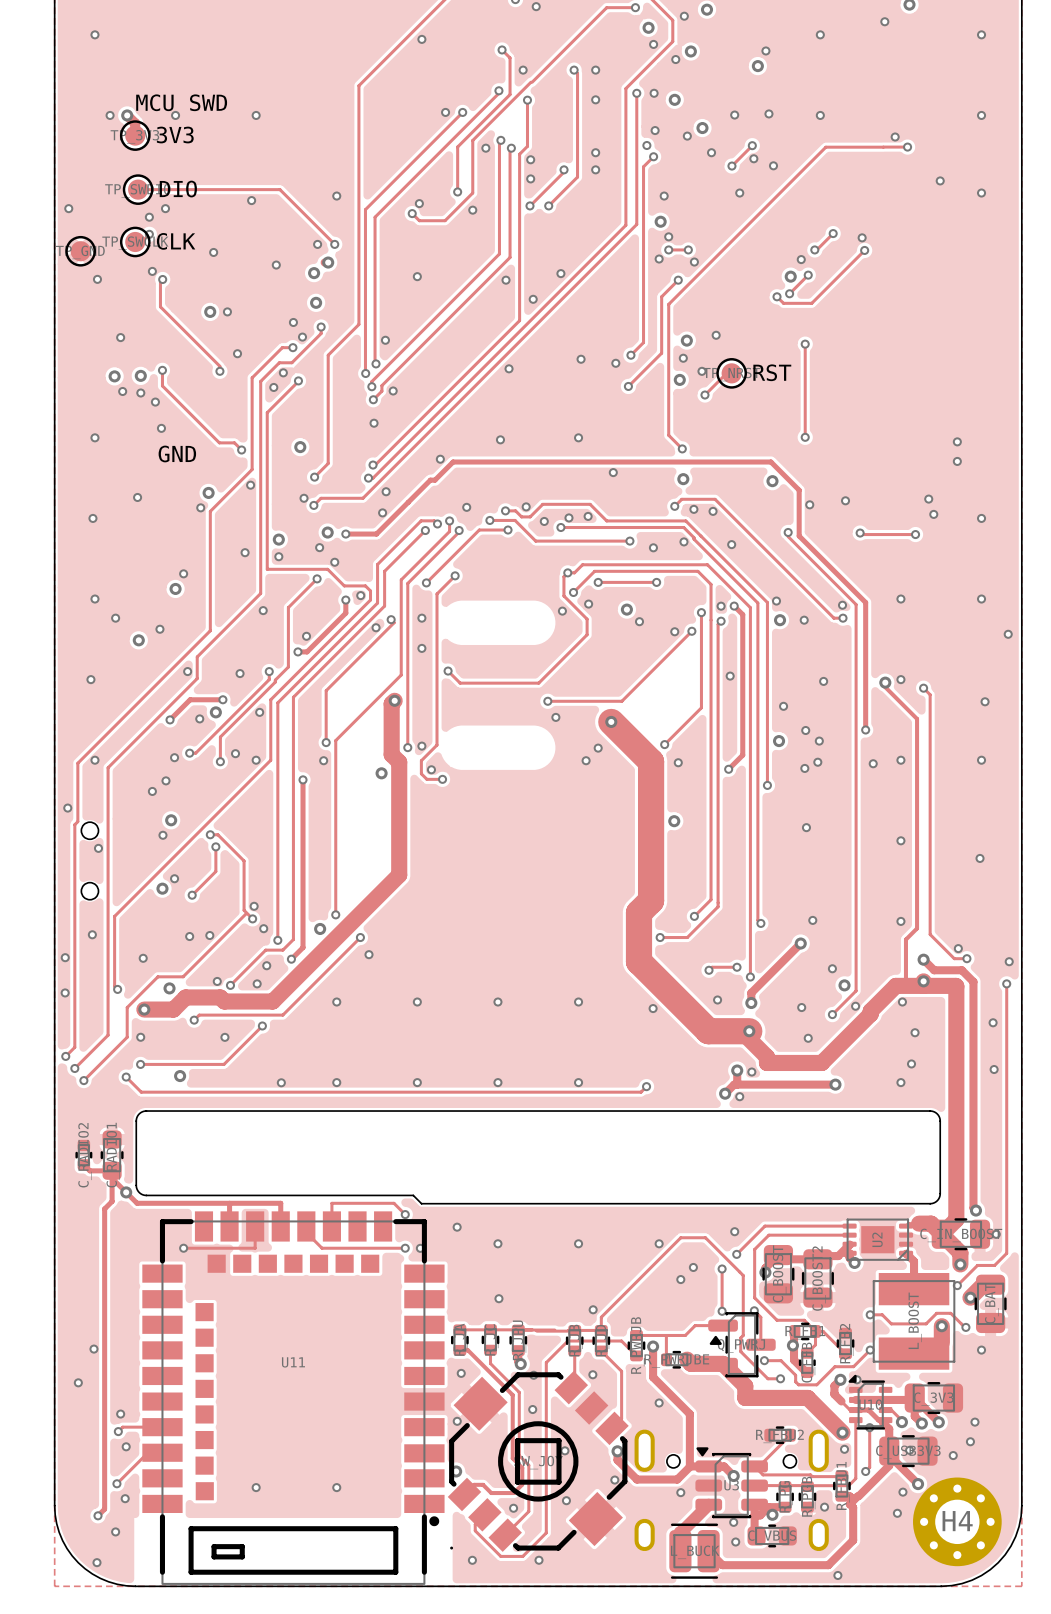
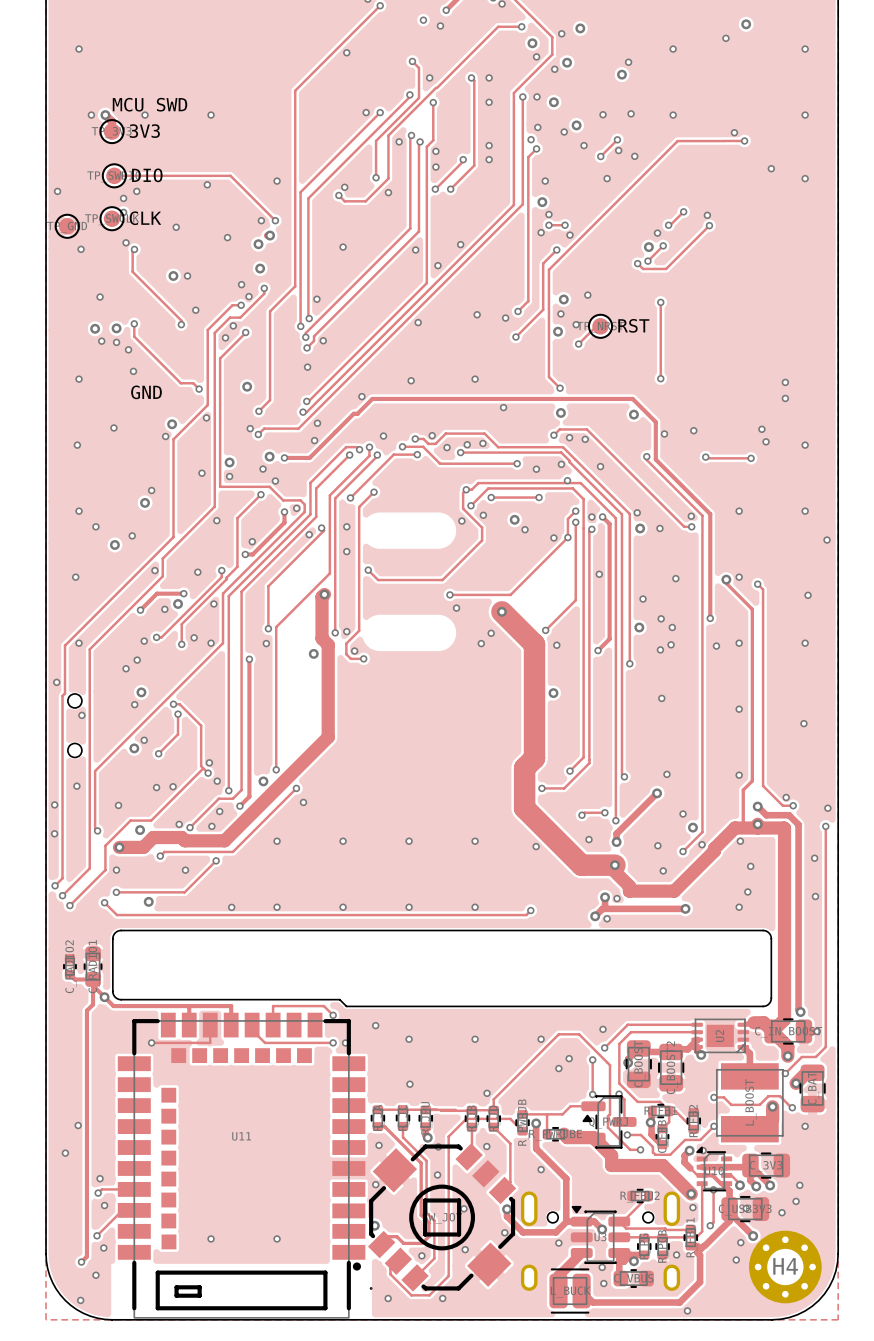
via: none -> (567, 480)
track: none -> (575, 511) (567, 518) (567, 537)
via: none -> (575, 511)

